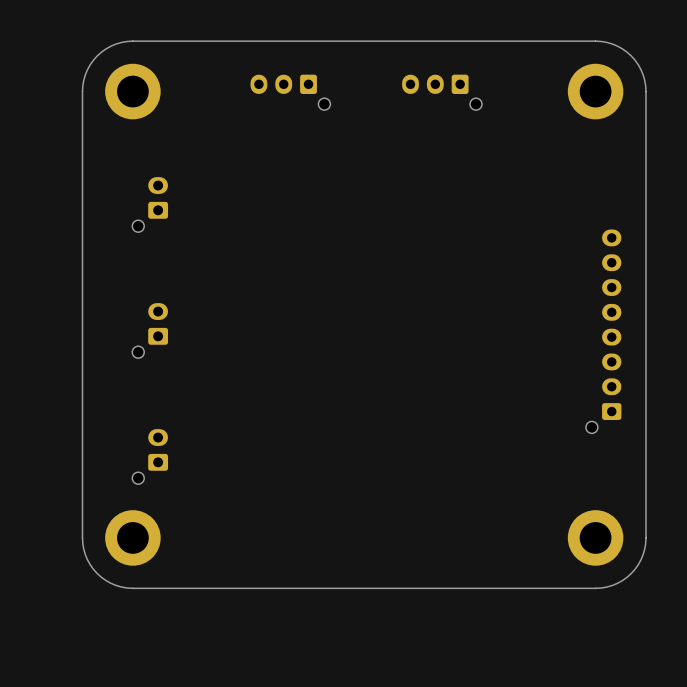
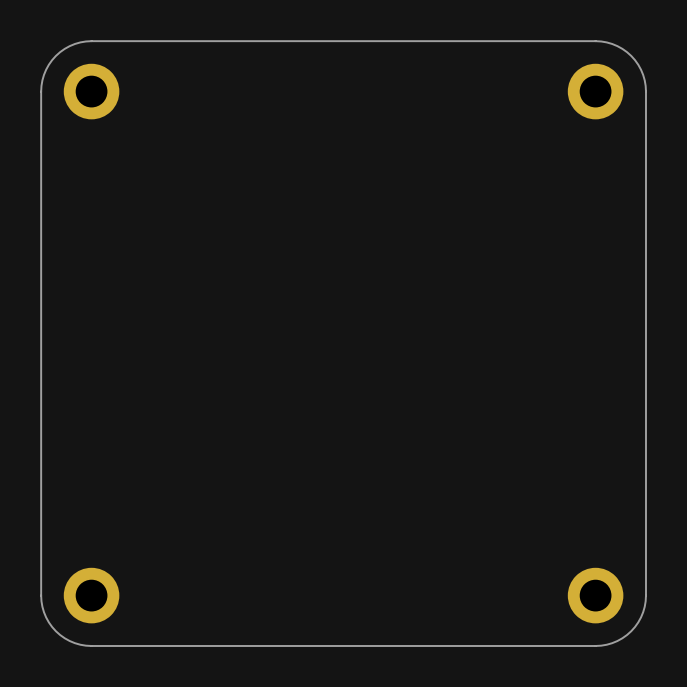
board edge: (132, 41) (111, 46) (97, 55) (87, 69) (82, 85) (82, 537) (85, 554) (97, 573) (111, 583) (132, 588) (601, 588) (617, 583) (631, 573) (641, 559) (645, 537) -> (132, 41) (85, 41) (69, 46) (55, 55) (48, 64) (41, 85) (41, 595) (46, 617) (55, 631) (74, 643) (91, 645) (601, 645) (622, 638) (634, 627) (641, 617) (645, 601) (645, 537)
part position: (132, 91) -> (91, 91)
part: (290, 92) -> none
part: (442, 92) -> none
part: (150, 204) -> none
part: (150, 330) -> none
part: (603, 331) -> none
part: (150, 456) -> none
part position: (132, 537) -> (91, 595)
part position: (595, 537) -> (595, 595)

